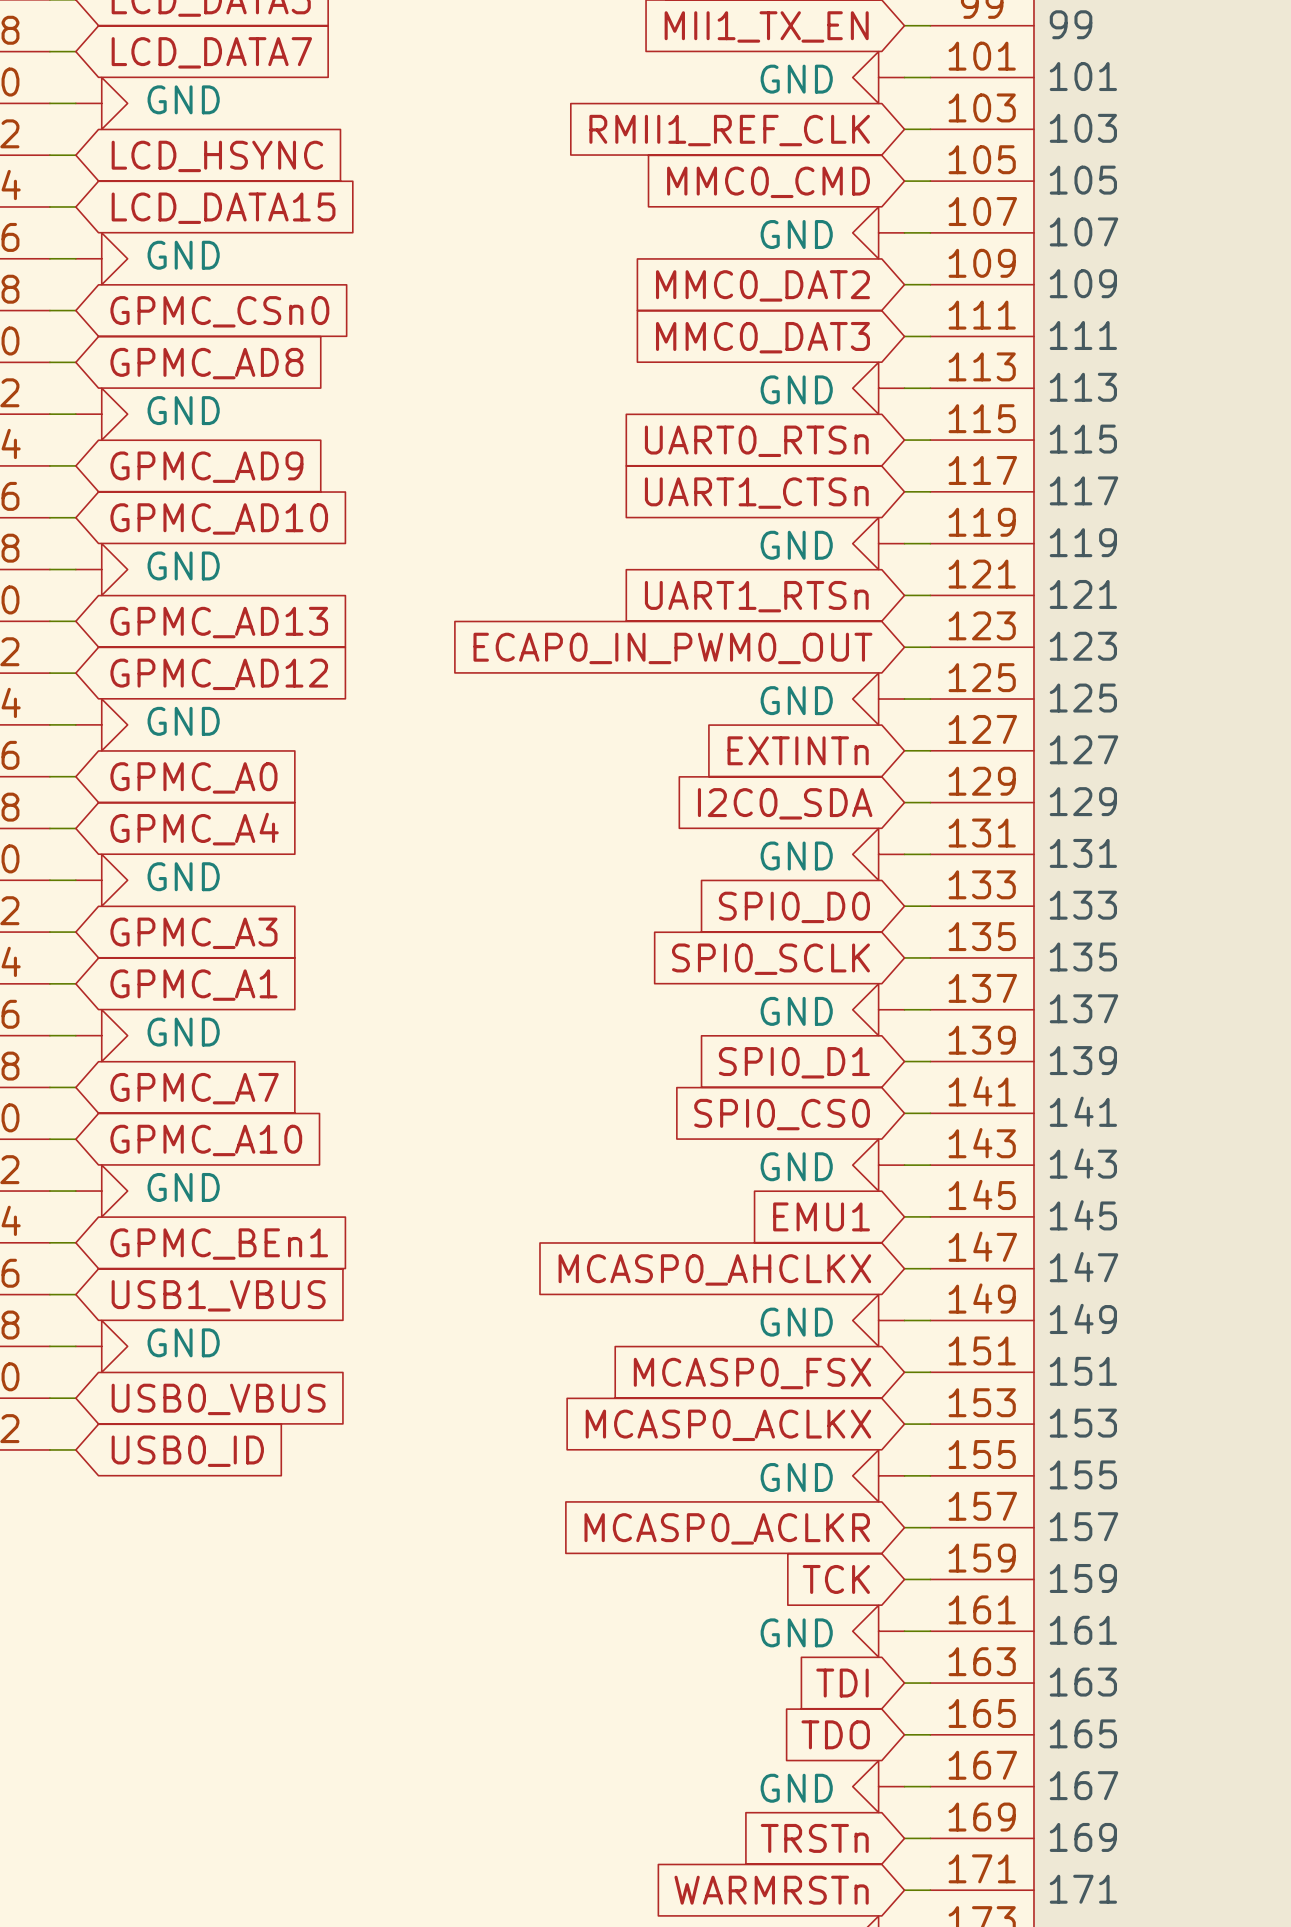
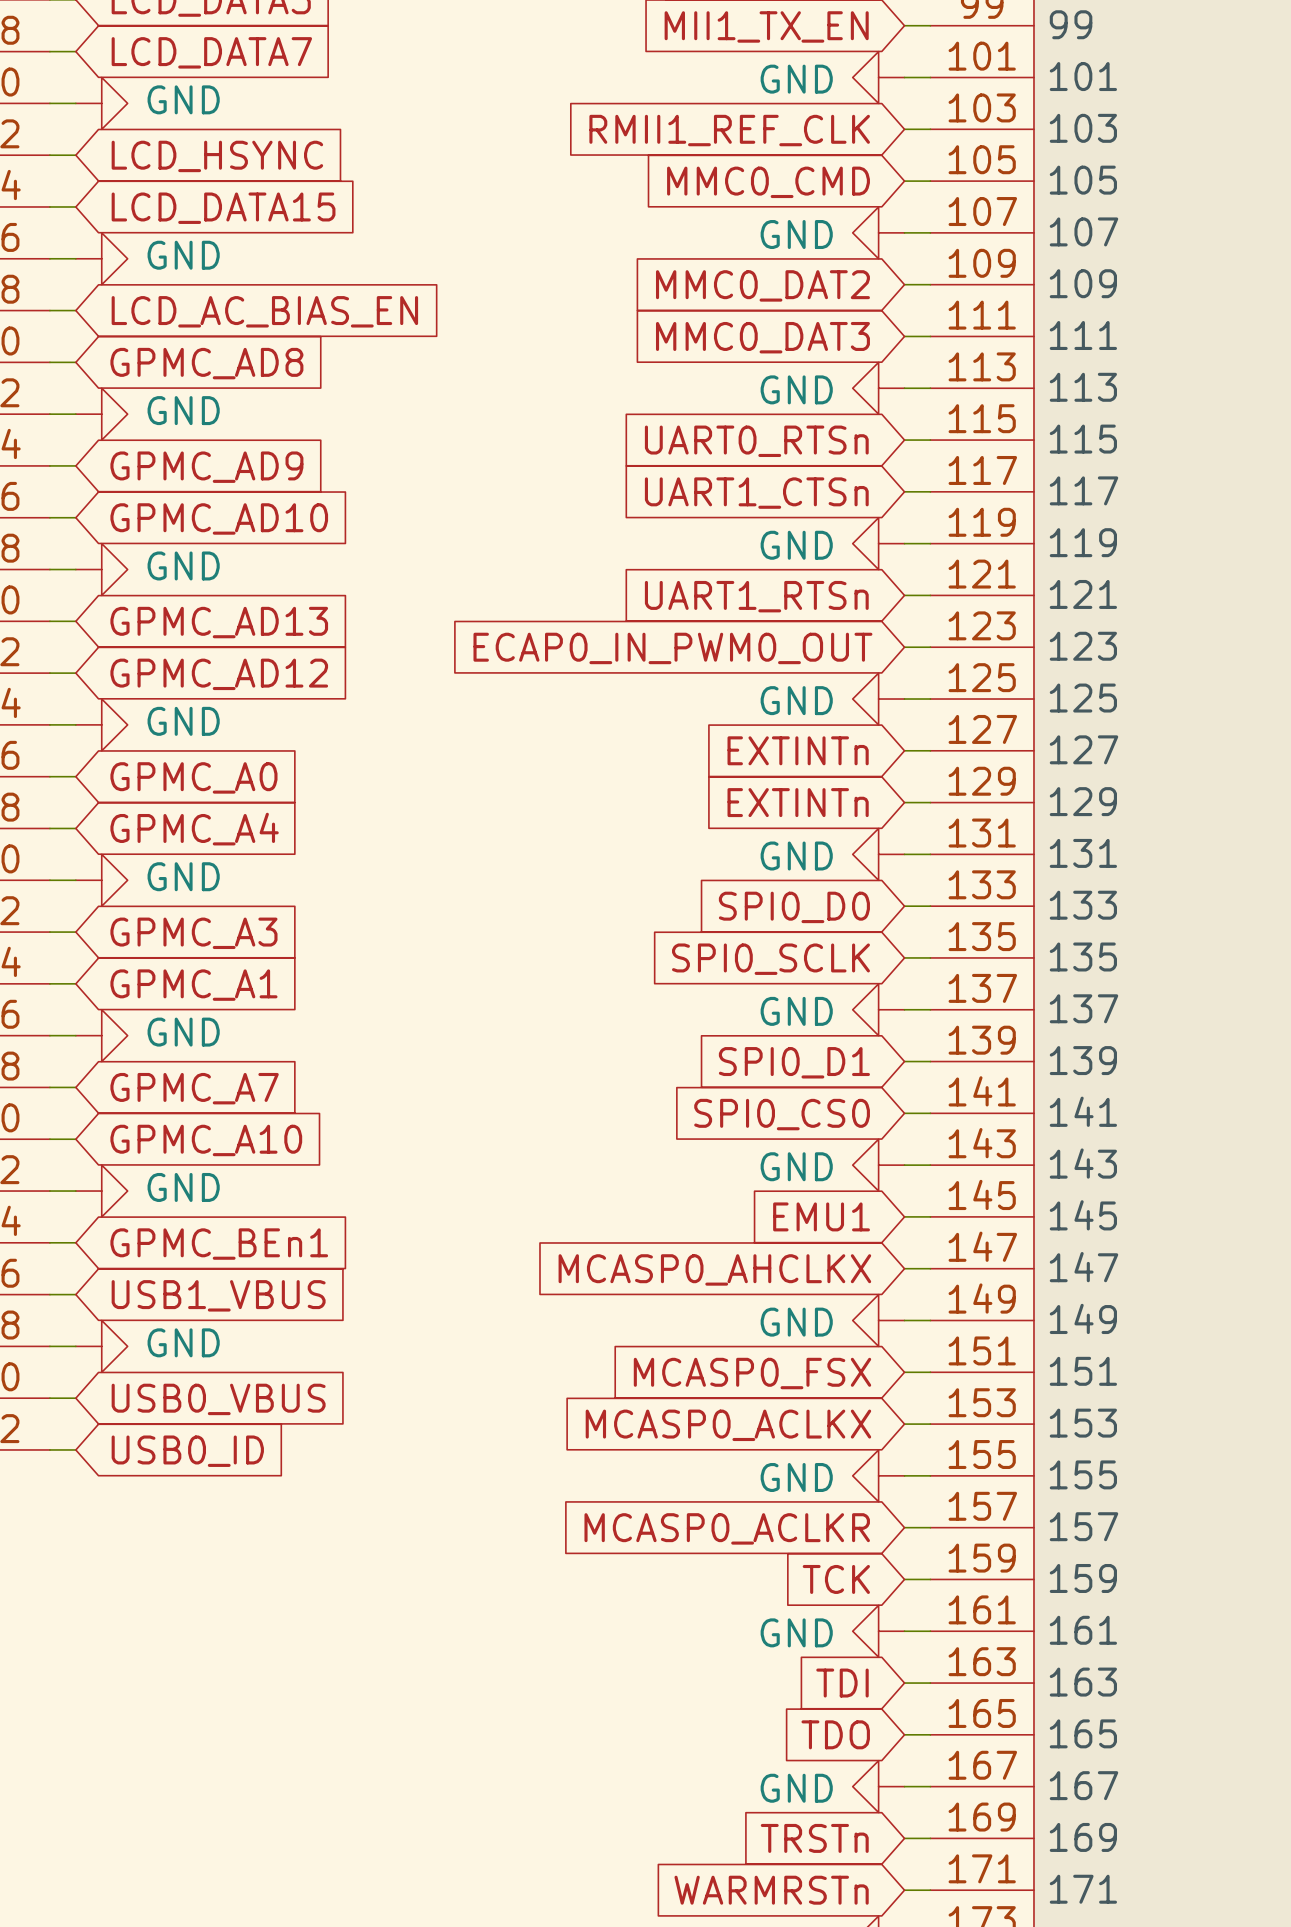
global label: GPMC_CSn0 (219, 311) -> LCD_AC_BIAS_EN (264, 311)
global label: I2C0_SDA (785, 803) -> EXTINTn (798, 802)

